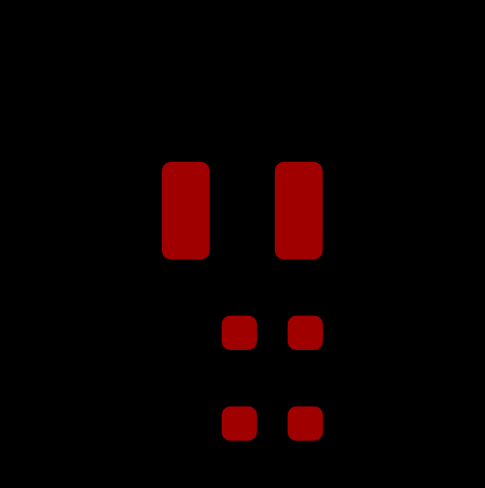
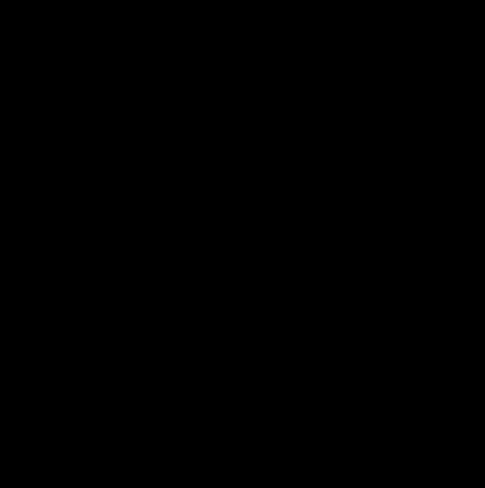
part: (242, 210) -> none
part: (272, 332) -> none
part: (272, 423) -> none

